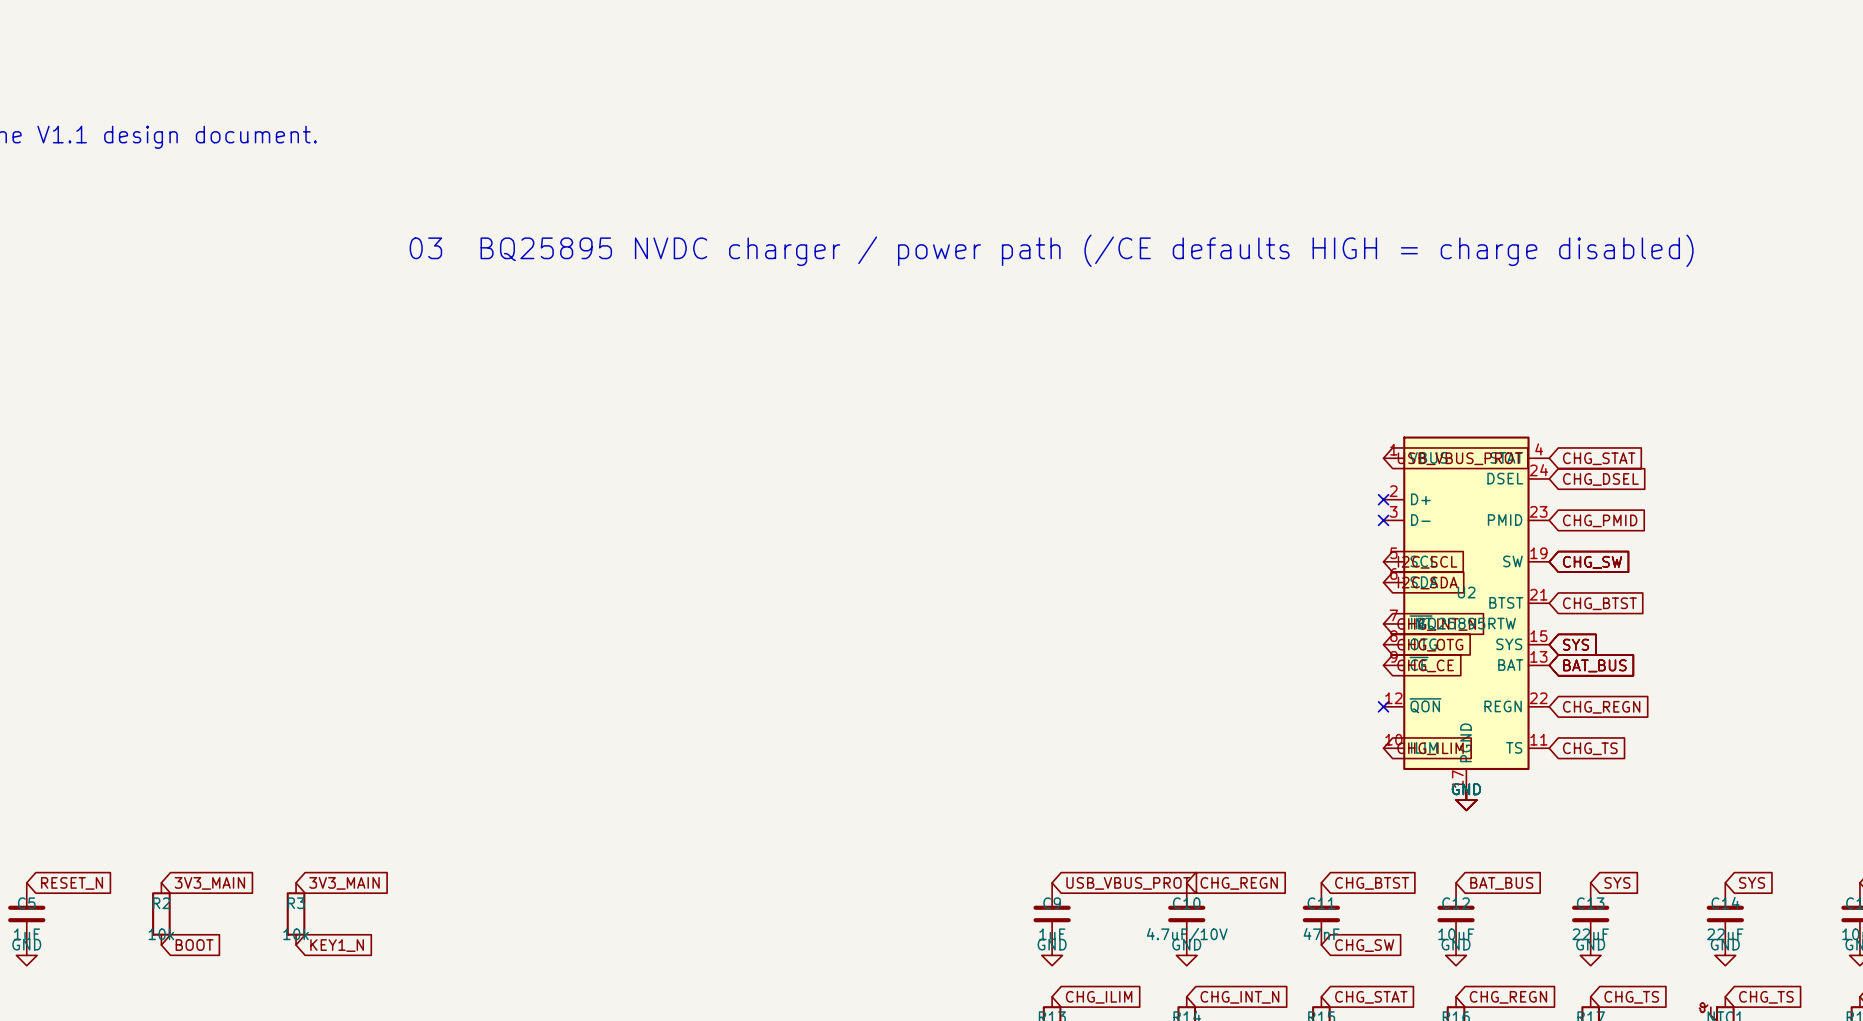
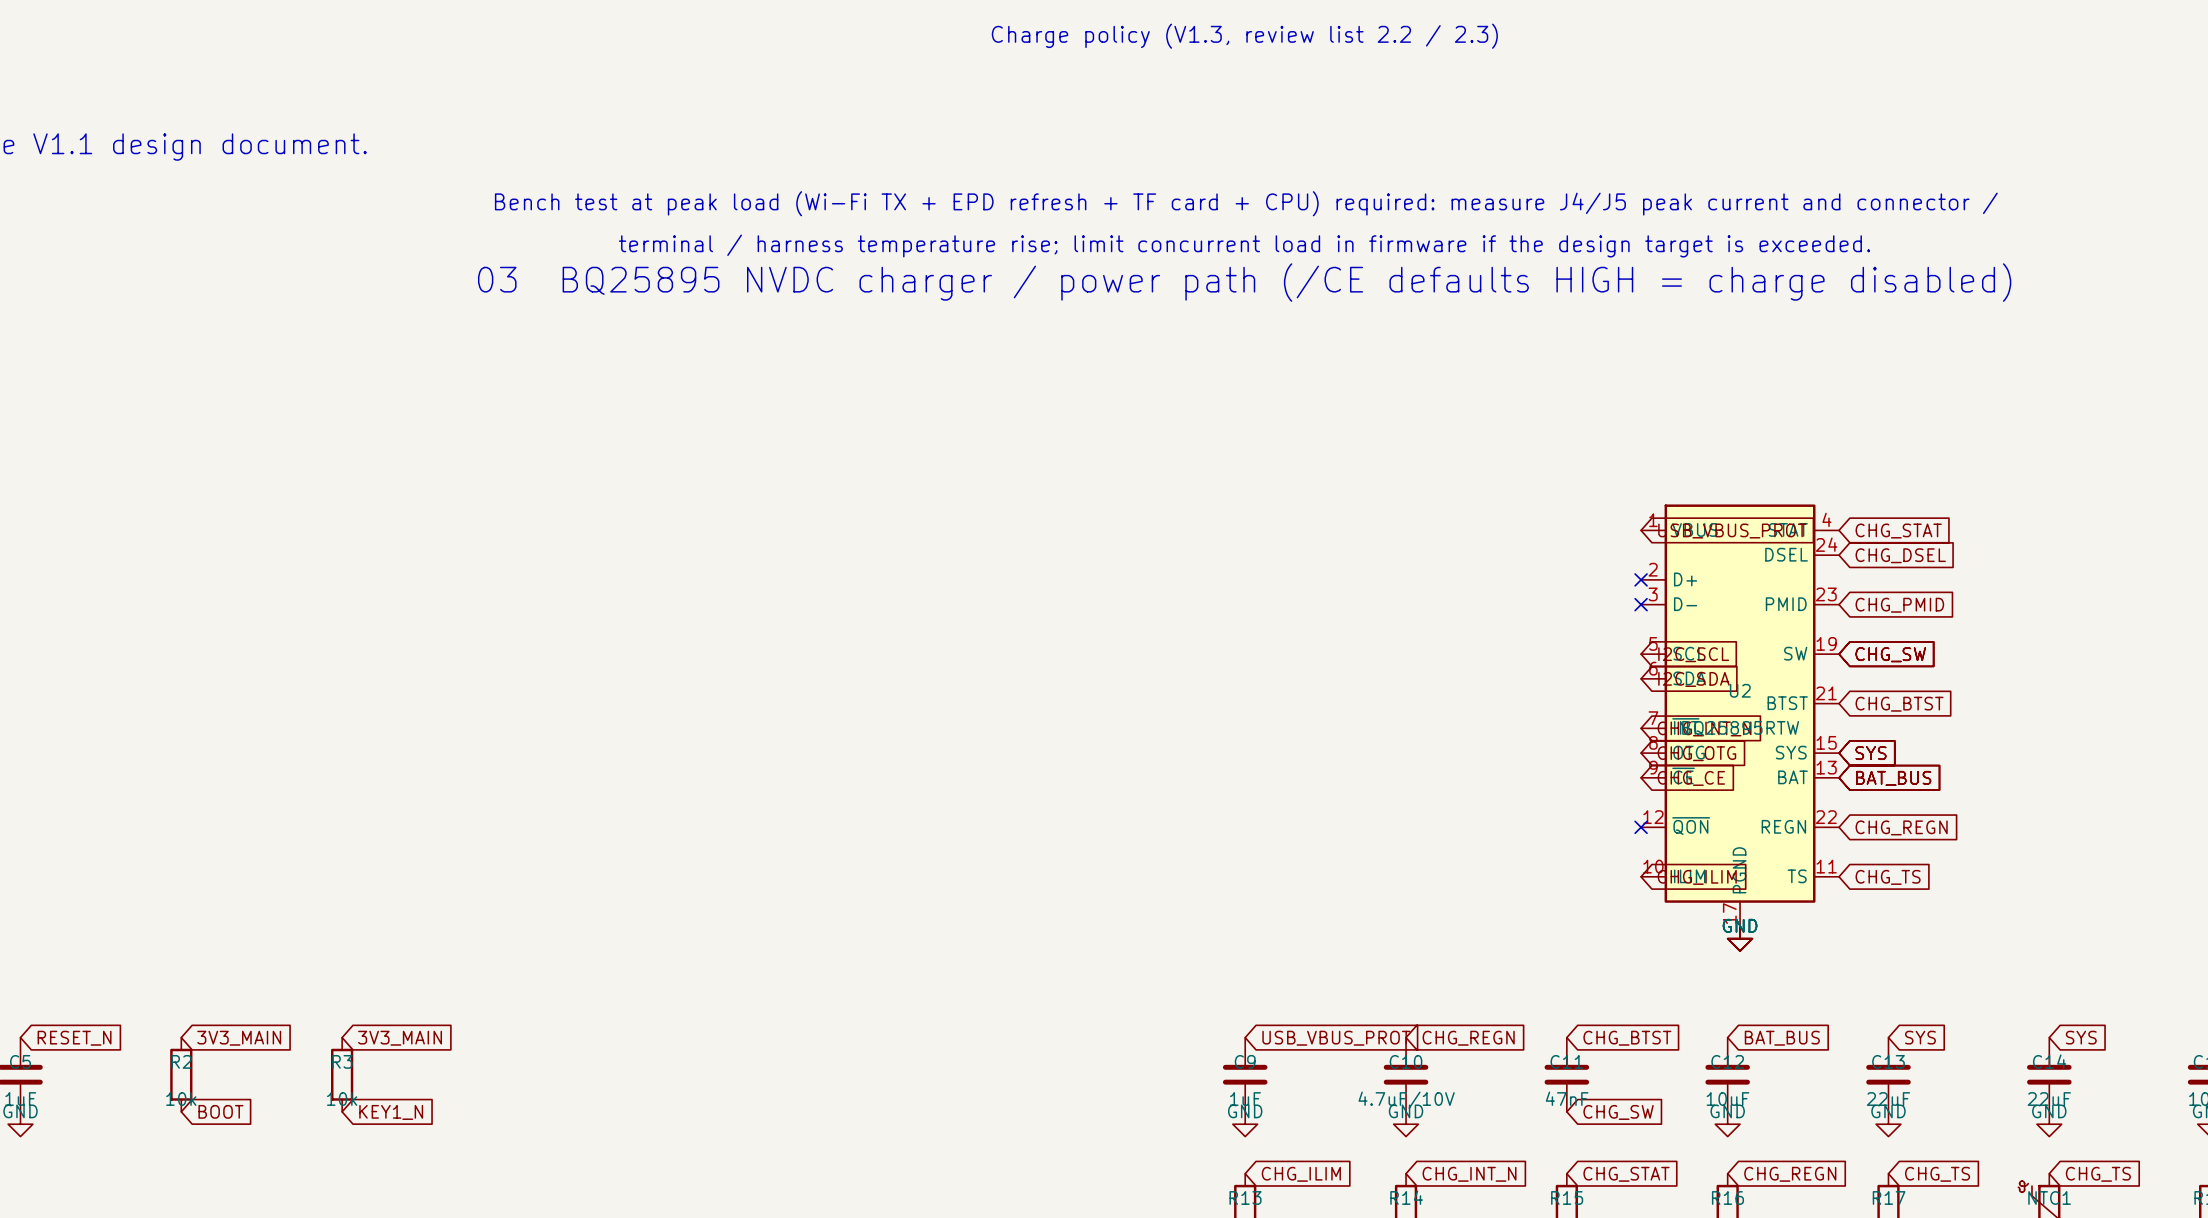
text: none -> Charge policy (V1.3, review list 2.2 / 2.3) (1244, 36)
text: none -> Bench test at peak load (Wi-Fi TX + EPD refresh + TF card + CPU) required: measure J4/J5 peak current and connector / (1246, 203)
text: none -> terminal / harness temperature rise; limit concurrent load in firmware if the design target is exceeded. (1244, 245)

